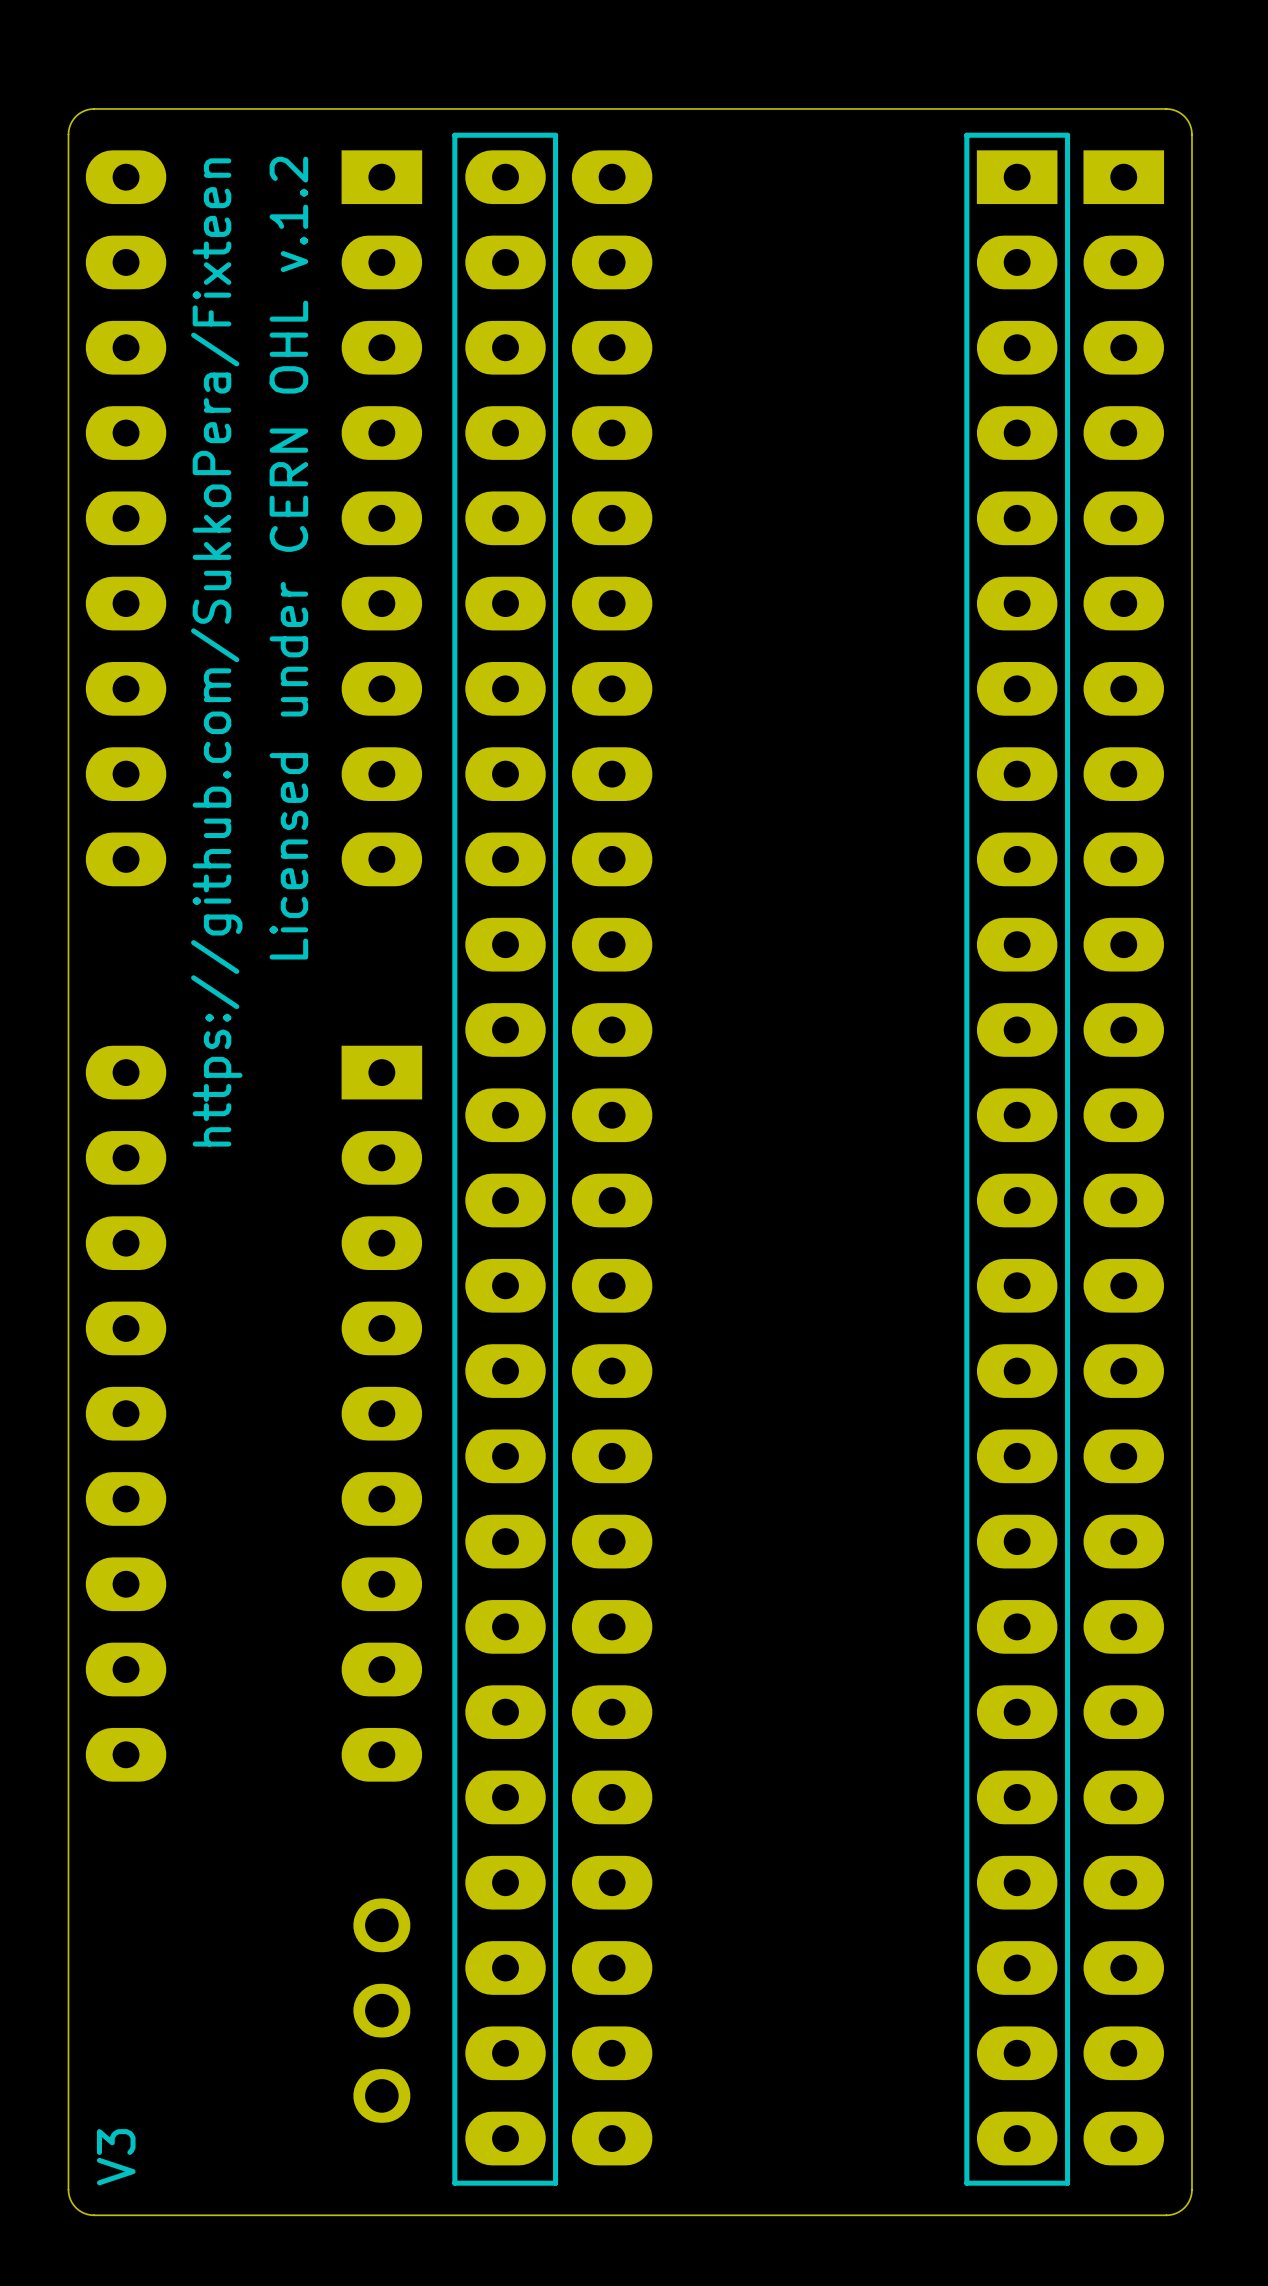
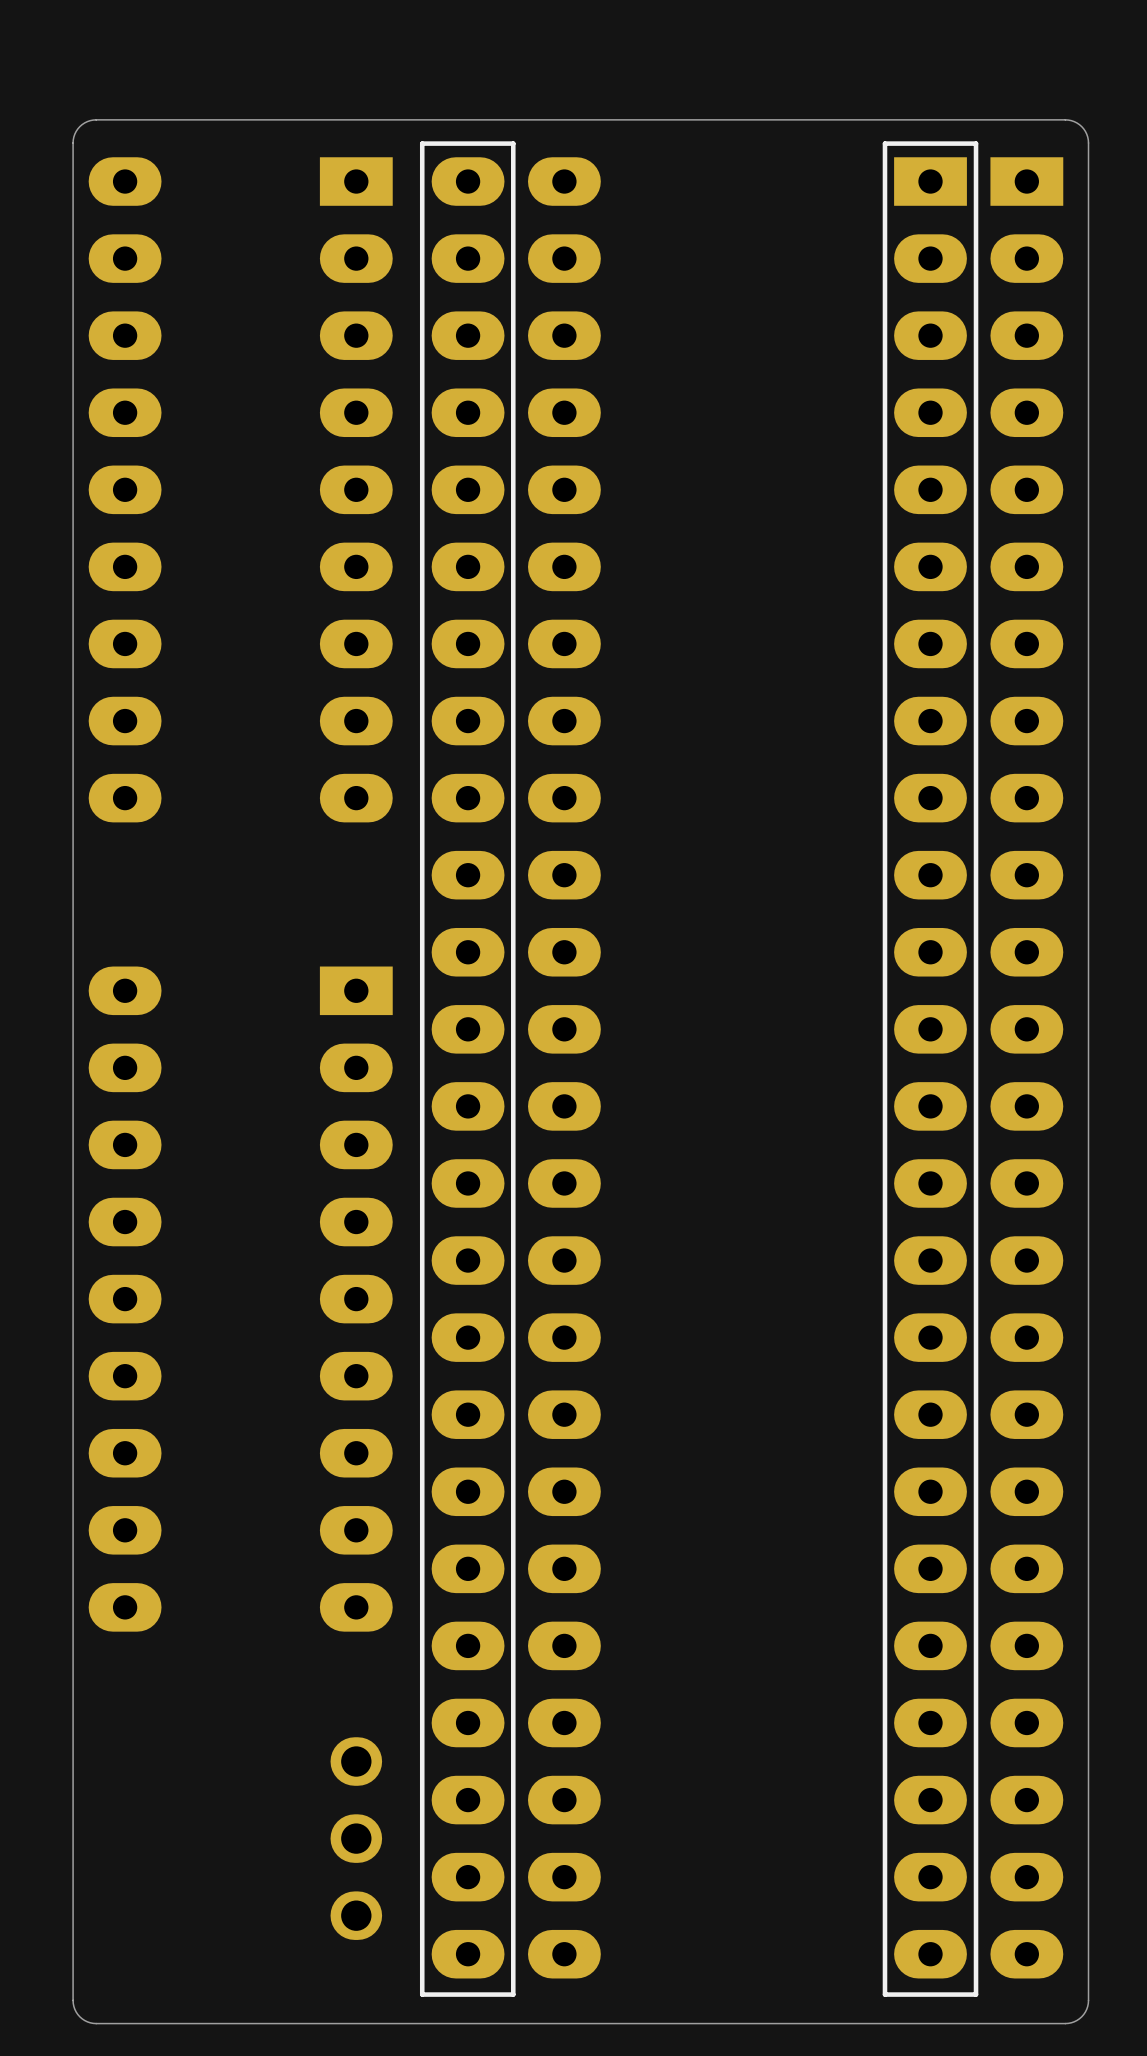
text: Licensed under CERN OHL v.1.2 (288, 558) -> none
text: https://github.com/SukkoPera/Fixteen (216, 652) -> none
text: V3 (116, 2157) -> none

